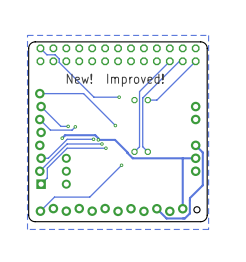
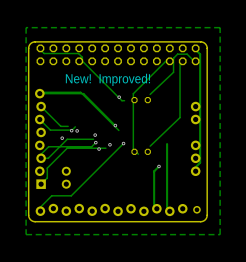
zone outline: (208, 35) (208, 229) (27, 229) (27, 35) (208, 35) -> (220, 27) (220, 234) (26, 234) (26, 27) (220, 27)
track: none -> (37, 47) (44, 53) (78, 53) (82, 57) (82, 61) (121, 100) (124, 100)
track: none -> (192, 47) (200, 54) (200, 162) (192, 169)
track: (40, 48) (46, 54) (55, 54) (59, 58) (59, 62) (93, 97) (119, 97) -> none
track: none -> (167, 59) (133, 93) (133, 149) (138, 154)
track: none -> (180, 59) (180, 117) (150, 146)
track: none -> (192, 59) (187, 54) (177, 54) (173, 58) (173, 72) (150, 94)
track: (169, 61) (139, 91) (139, 146) (134, 151) -> none
track: (182, 61) (179, 61) (142, 98) (142, 146) (147, 151) -> none
track: (195, 61) (156, 100) (147, 100) -> none
track: none -> (37, 92) (80, 92) (118, 130)
via: (68, 126) -> none
via: (75, 126) -> none
via: none -> (71, 130)
via: none -> (77, 130)
via: none -> (95, 135)
track: (62, 138) (65, 135) (95, 135) (98, 139) (115, 139) (132, 158) (195, 158) -> none
via: (93, 139) -> none
via: (98, 139) -> none
track: none -> (95, 142) (91, 146) (48, 146) (38, 157)
via: none -> (95, 142)
track: (101, 143) (67, 143) (39, 171) -> none
via: (101, 143) -> none
track: none -> (123, 143) (71, 195) (51, 195) (37, 209)
via: none -> (123, 143)
via: none -> (109, 144)
track: none -> (167, 144) (167, 210)
track: (195, 145) (202, 152) (202, 185) (189, 198) (189, 213) (184, 218) (166, 218) (156, 208) -> none
via: (105, 148) -> none
via: none -> (99, 149)
part: (66, 158) -> none
track: (182, 158) (182, 208) -> none
track: (121, 165) (89, 197) (54, 197) (40, 211) -> none
via: (121, 165) -> none
track: none -> (159, 166) (154, 171) (154, 207)
via: none -> (159, 166)

